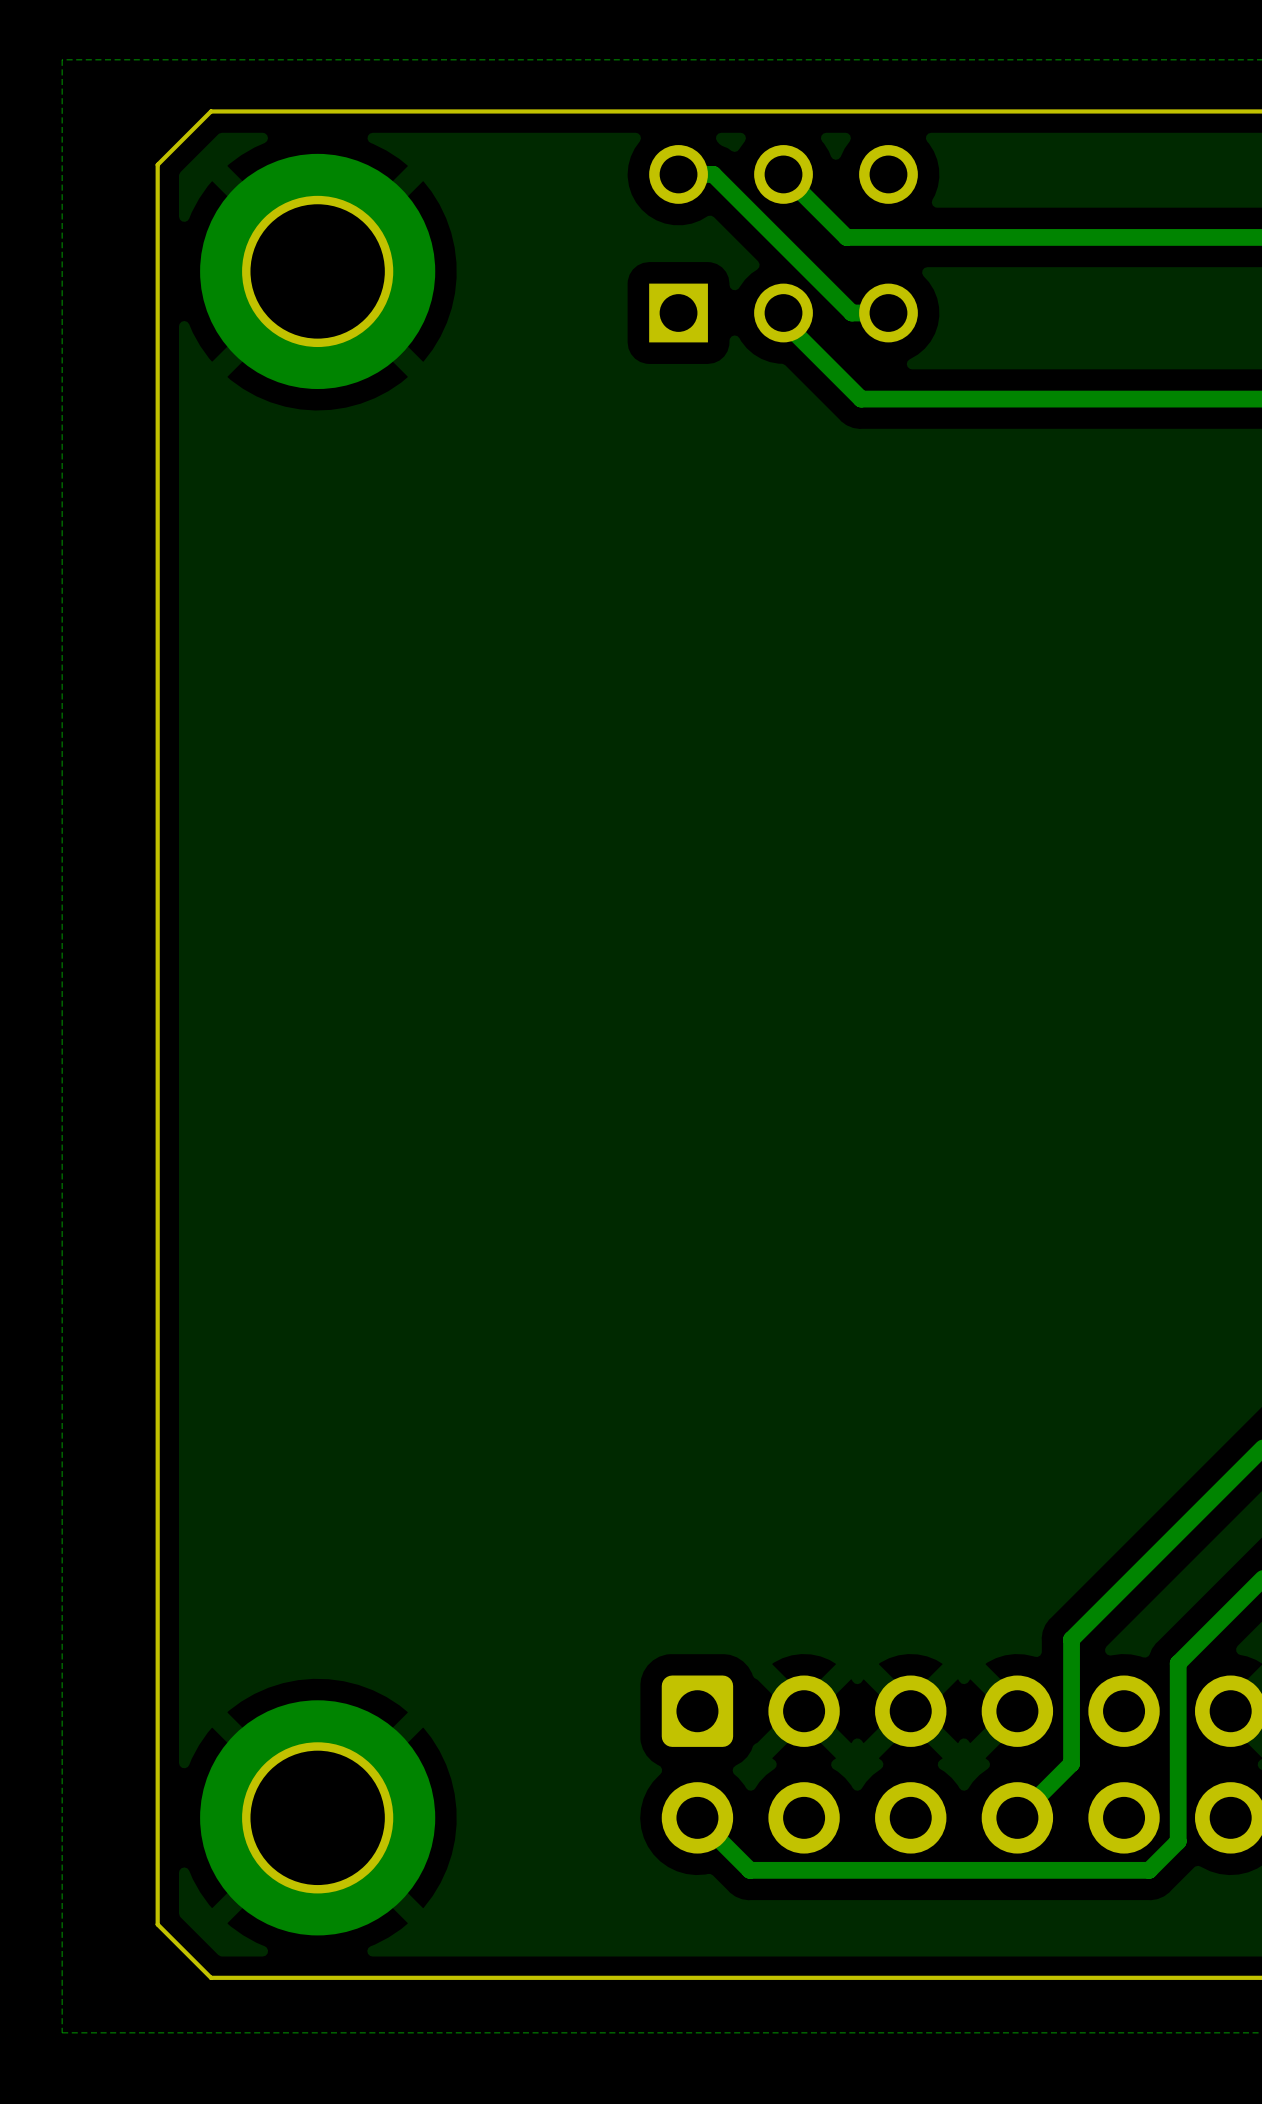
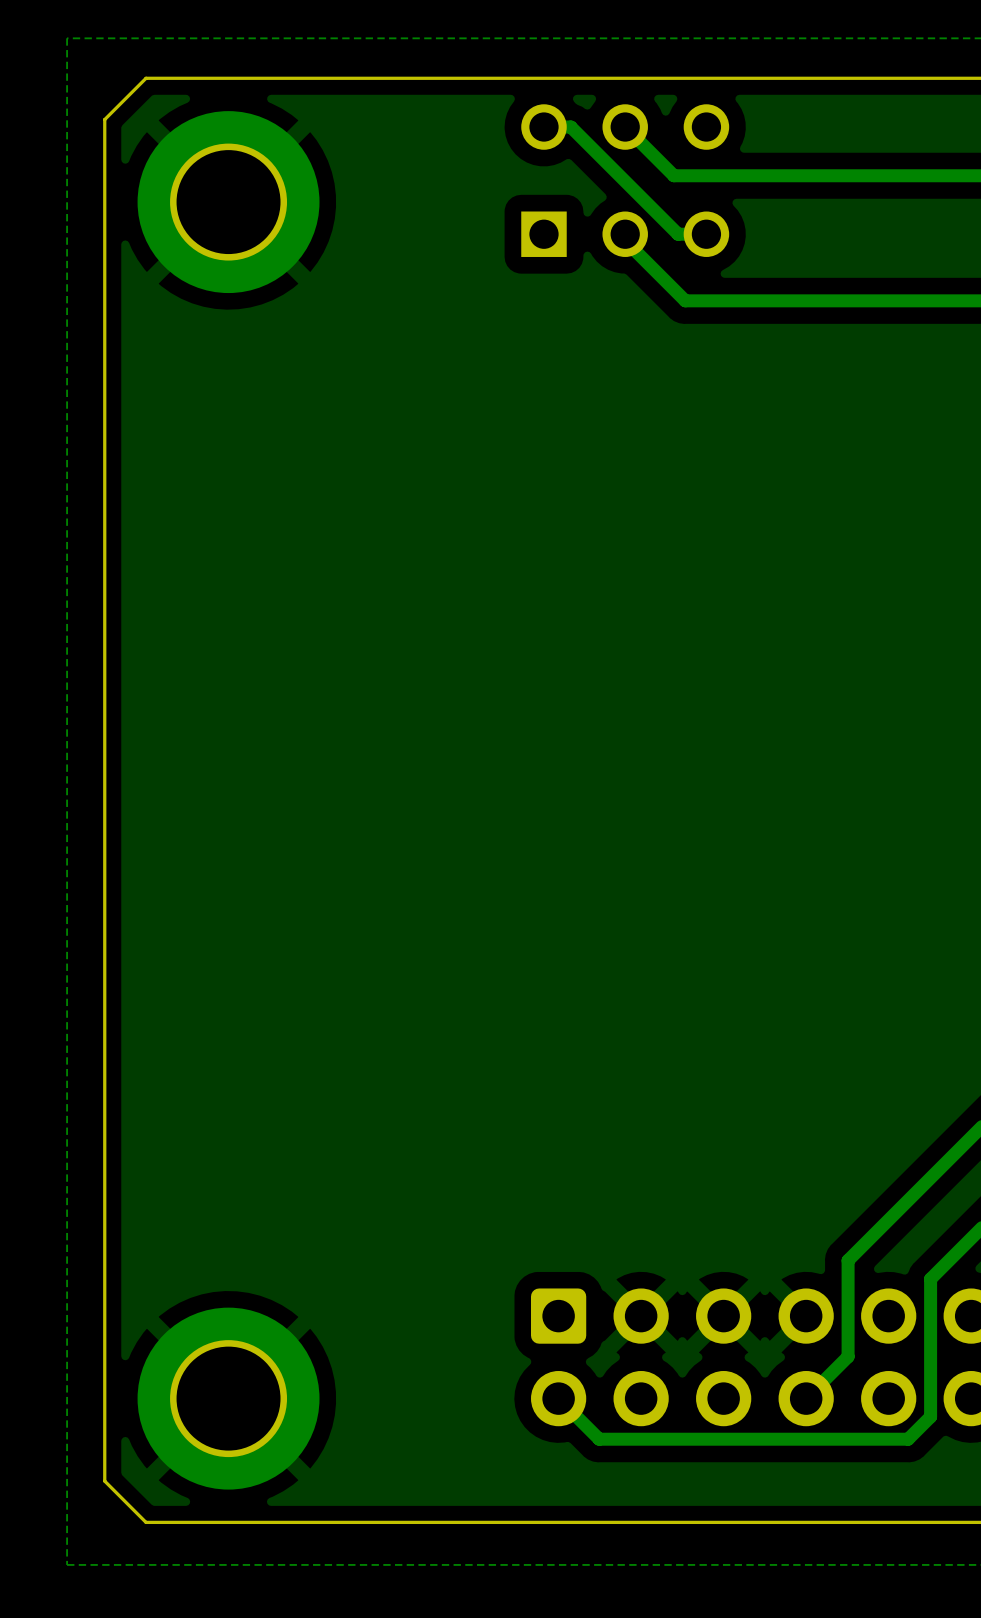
board edge: (211, 111) (157, 164) (157, 1924) (211, 1977) -> (182, 78) (146, 78) (104, 119) (104, 1481) (146, 1522) (182, 1522)
part position: (317, 271) -> (228, 202)
part position: (317, 1817) -> (228, 1398)

